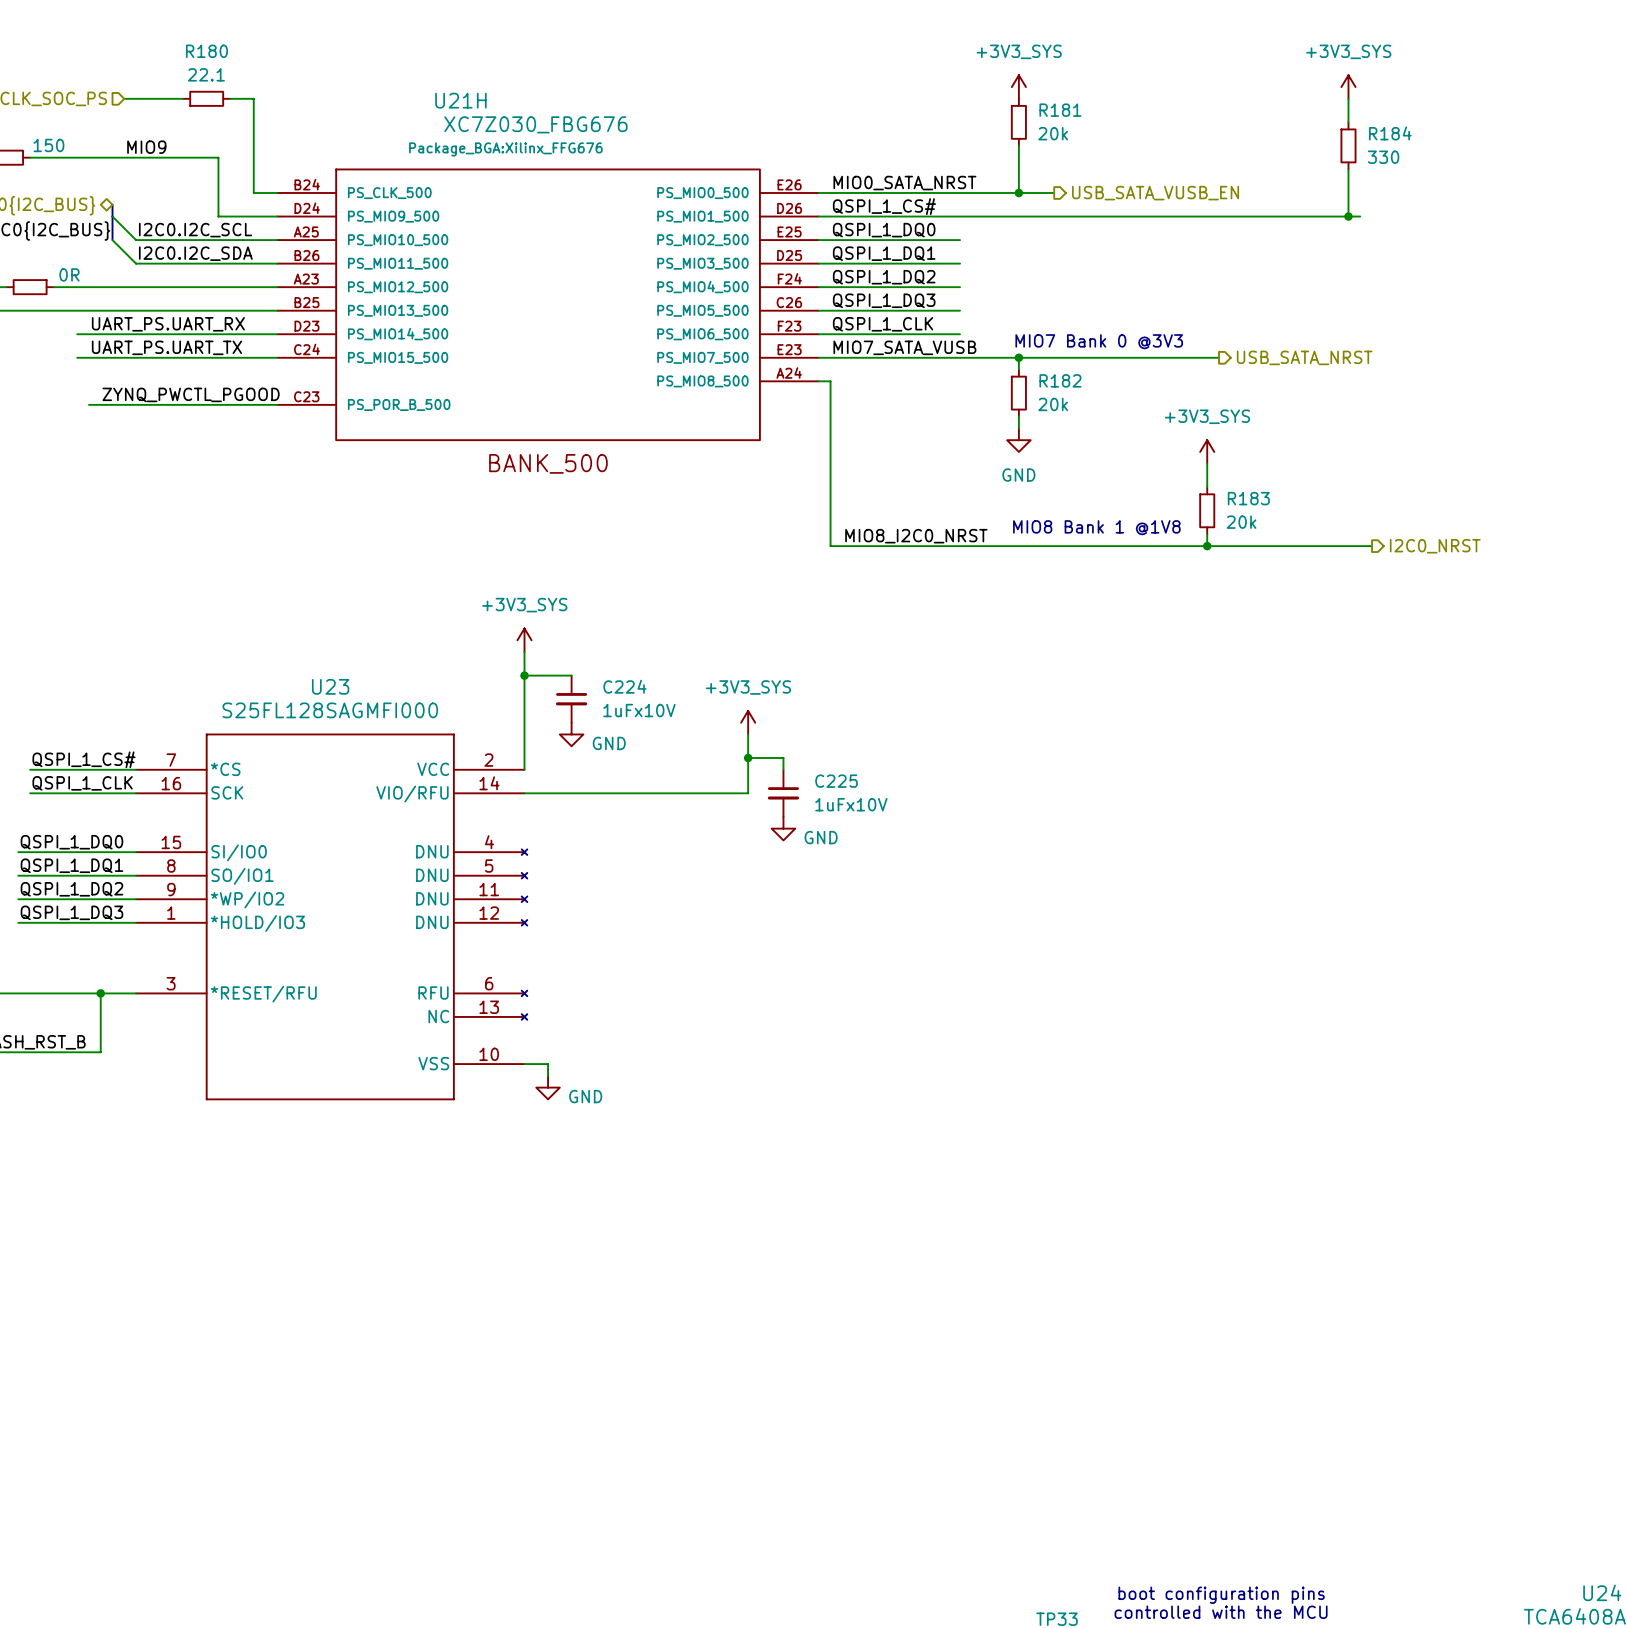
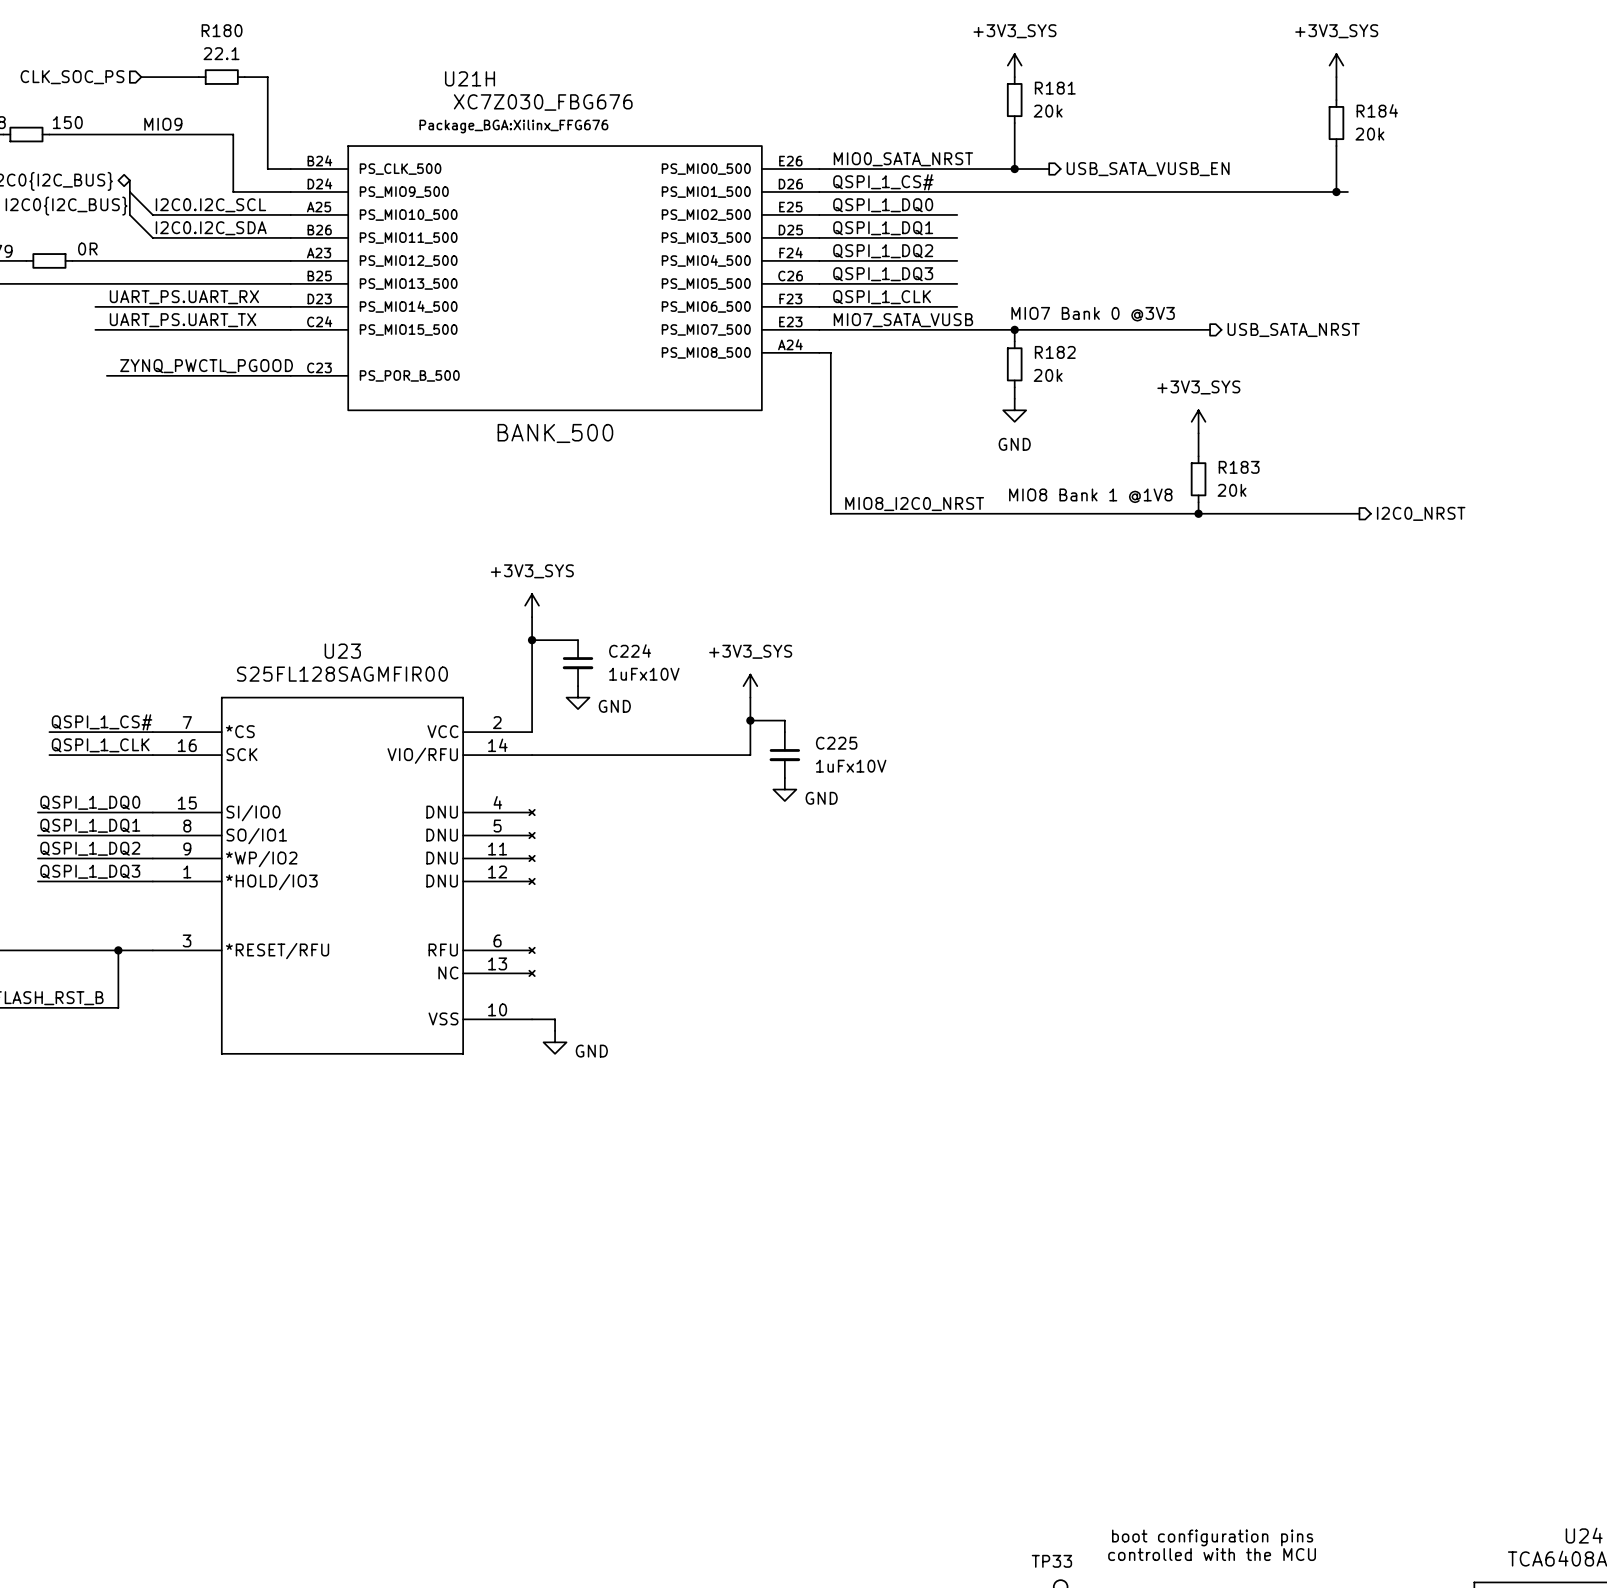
R184 value: 330 (1383, 157) -> 20k (1369, 134)
U23 value: S25FL128SAGMFI000 (330, 710) -> S25FL128SAGMFIR00 (342, 674)

